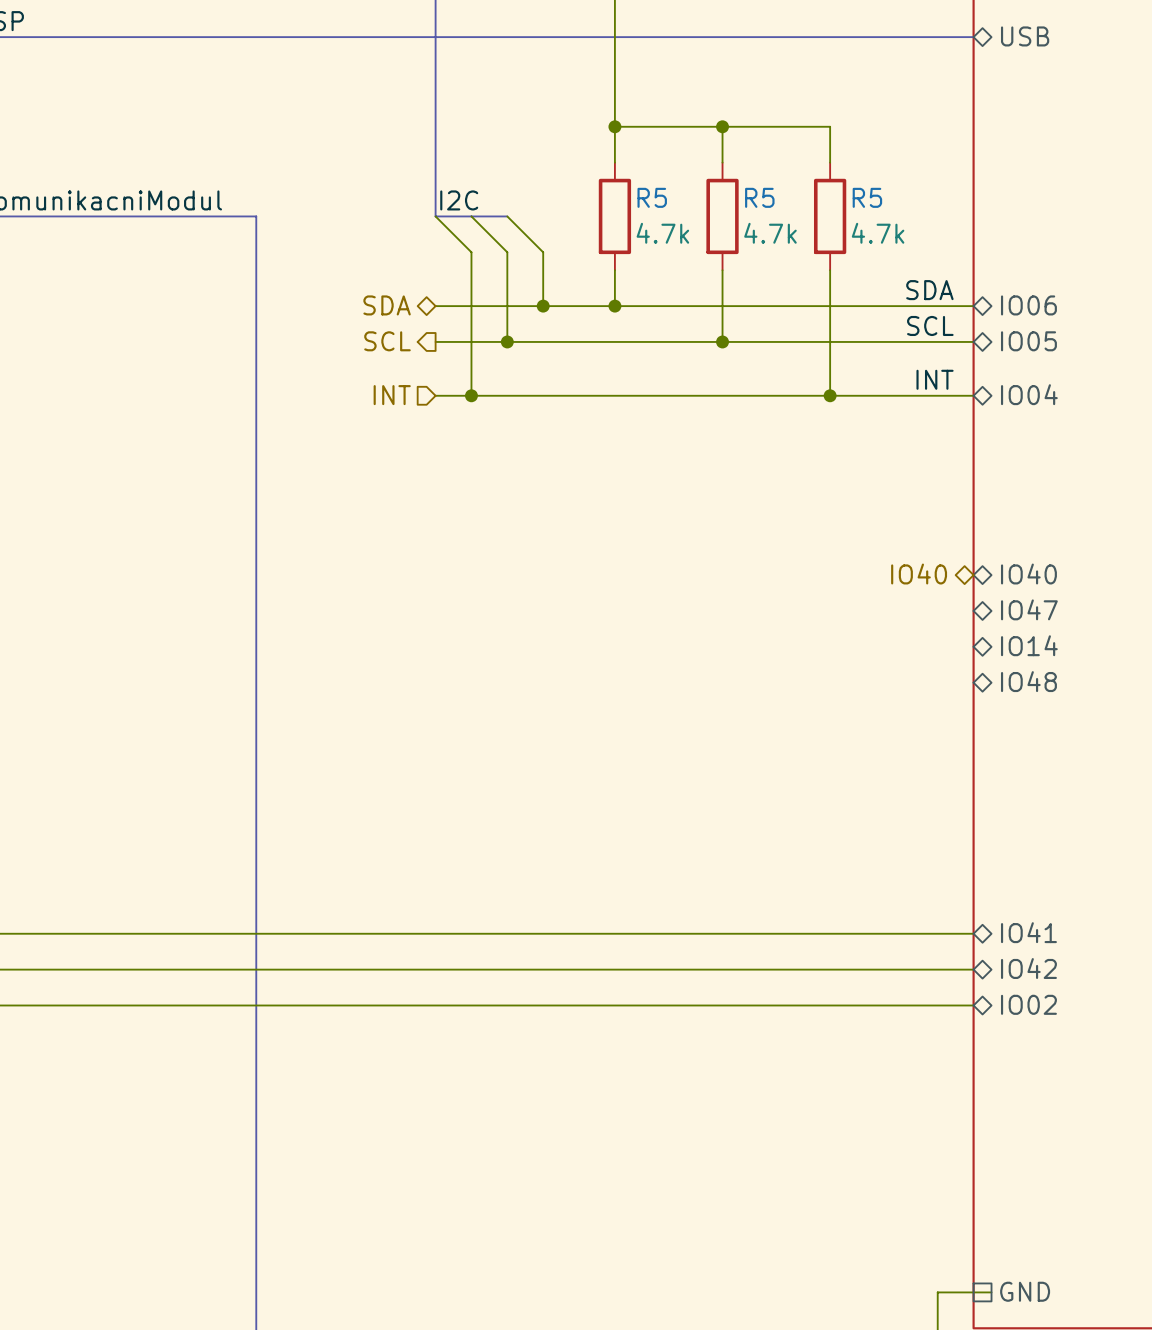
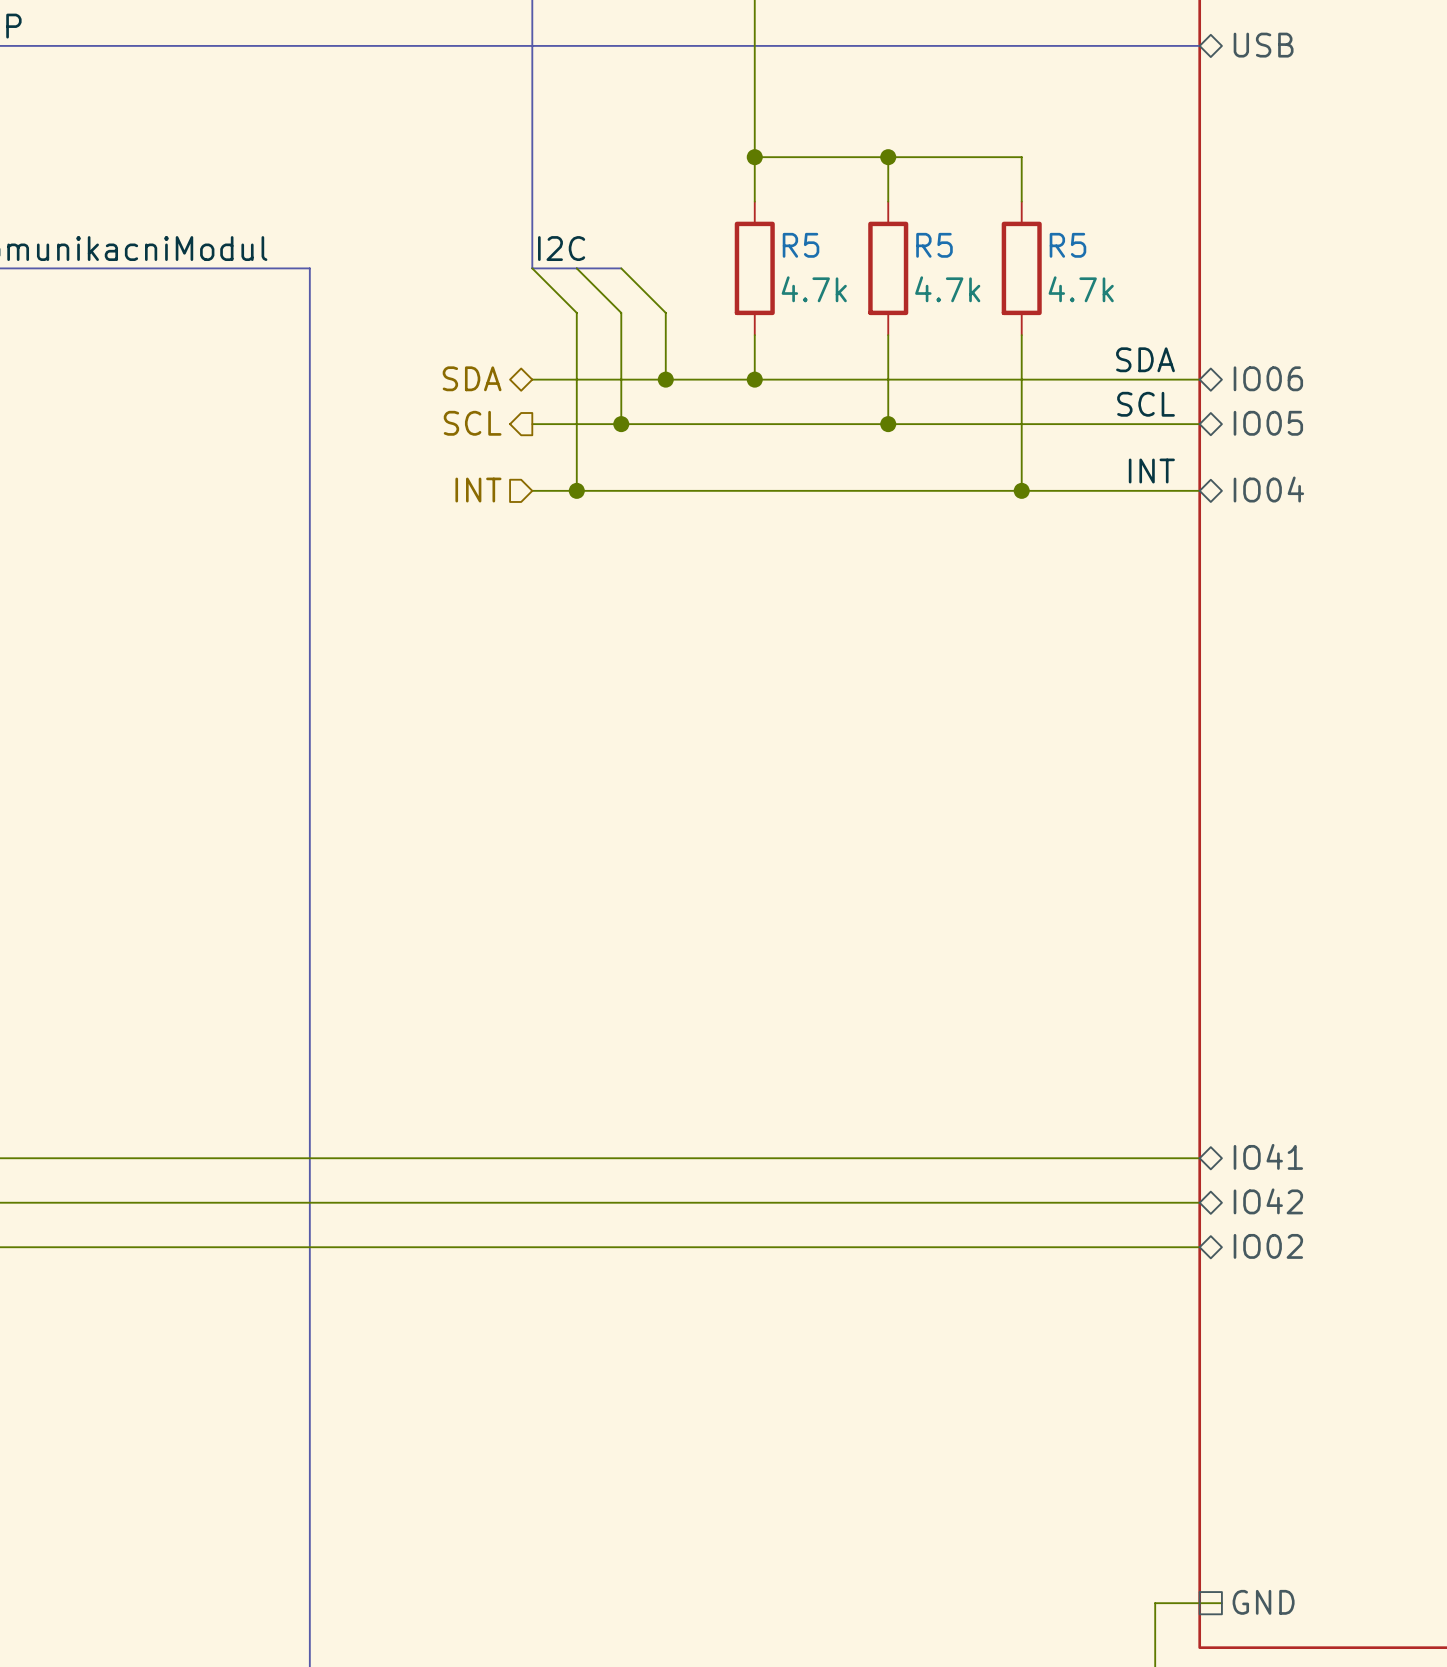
hierarchical label: IO40 (919, 574) -> none
sheet pin: IO40 (1028, 574) -> none
sheet pin: IO47 (1029, 609) -> none
sheet pin: IO14 (1029, 645) -> none
sheet pin: IO48 (1028, 681) -> none

